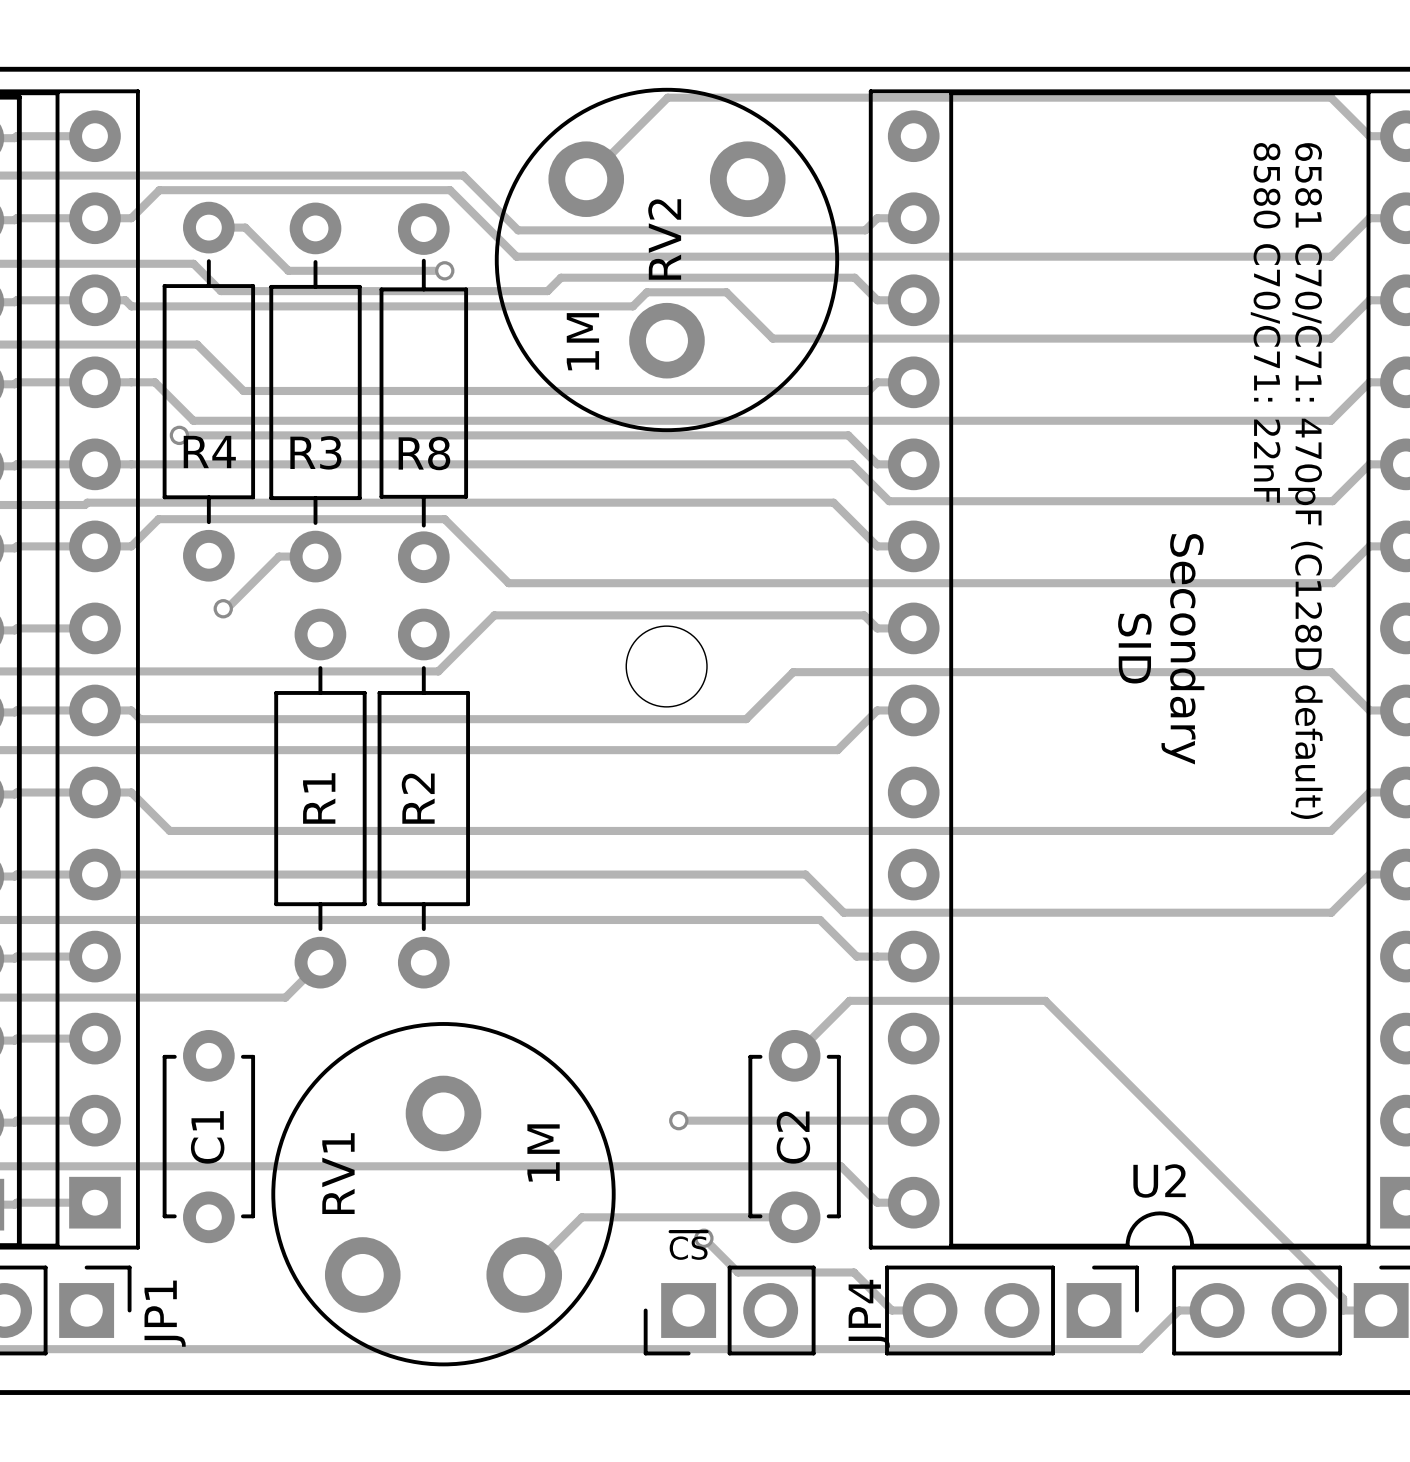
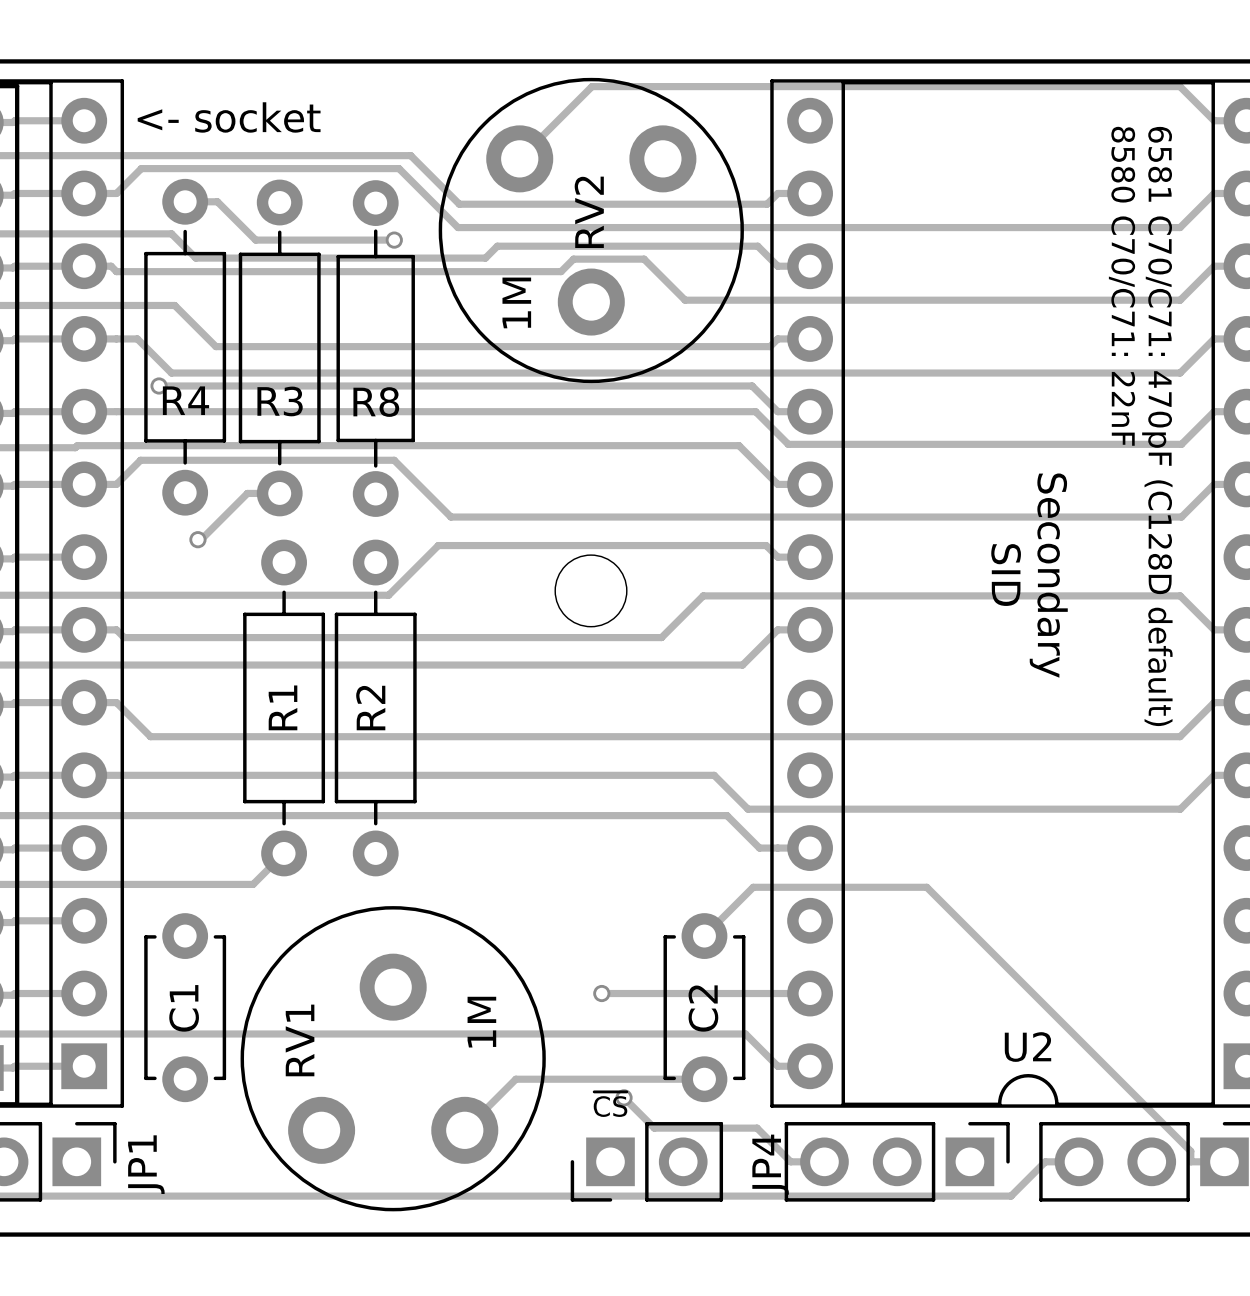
text: none -> <- socket (229, 117)

